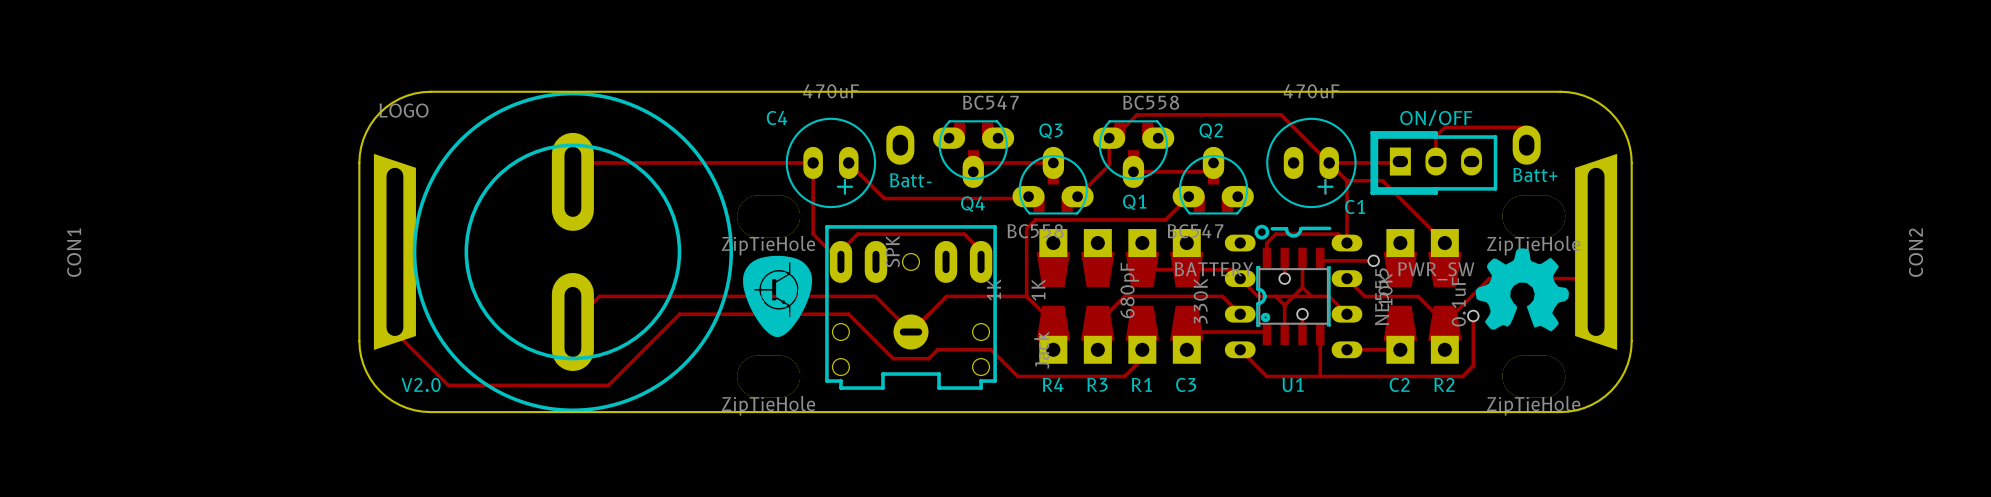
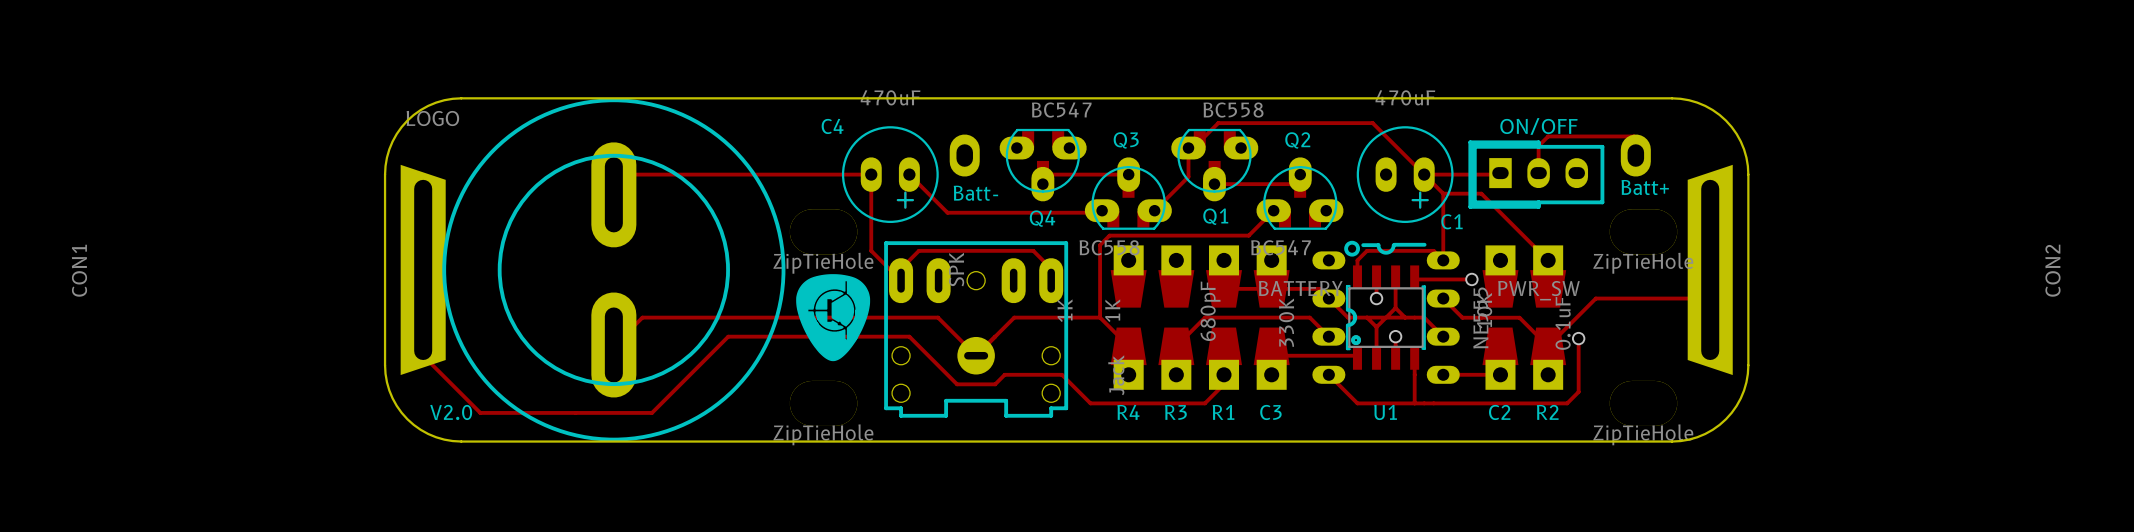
drawing: [1475, 248, 1569, 332] -> none

